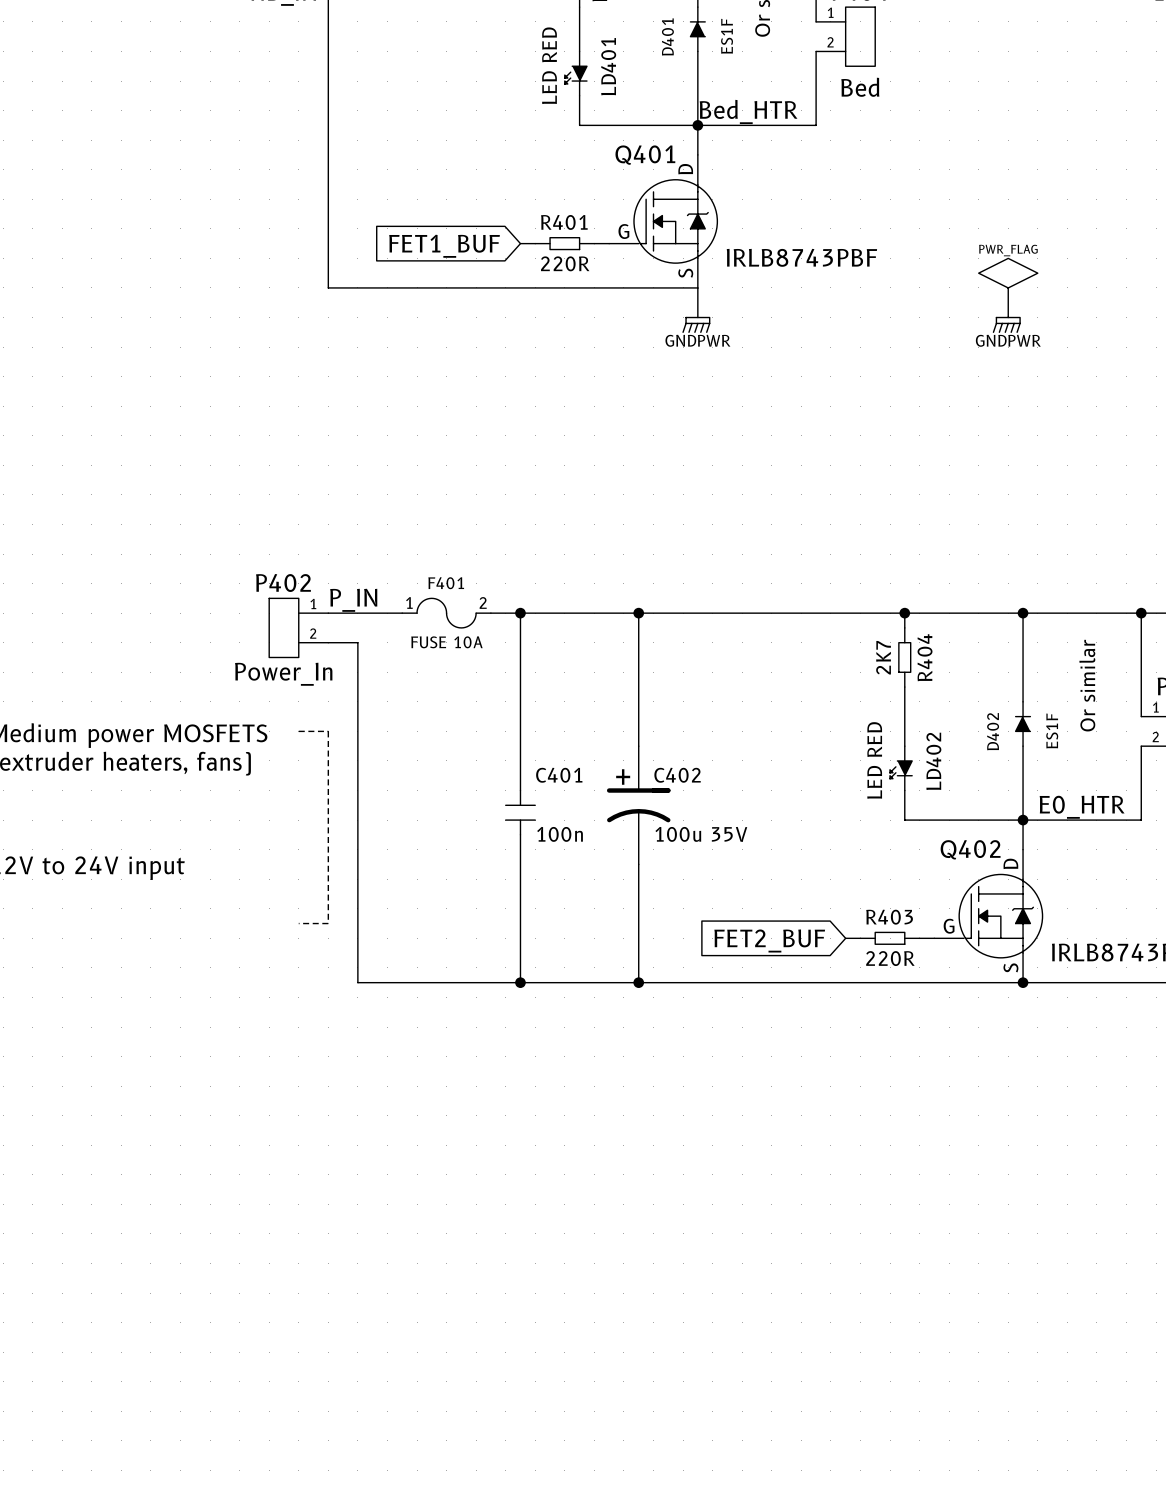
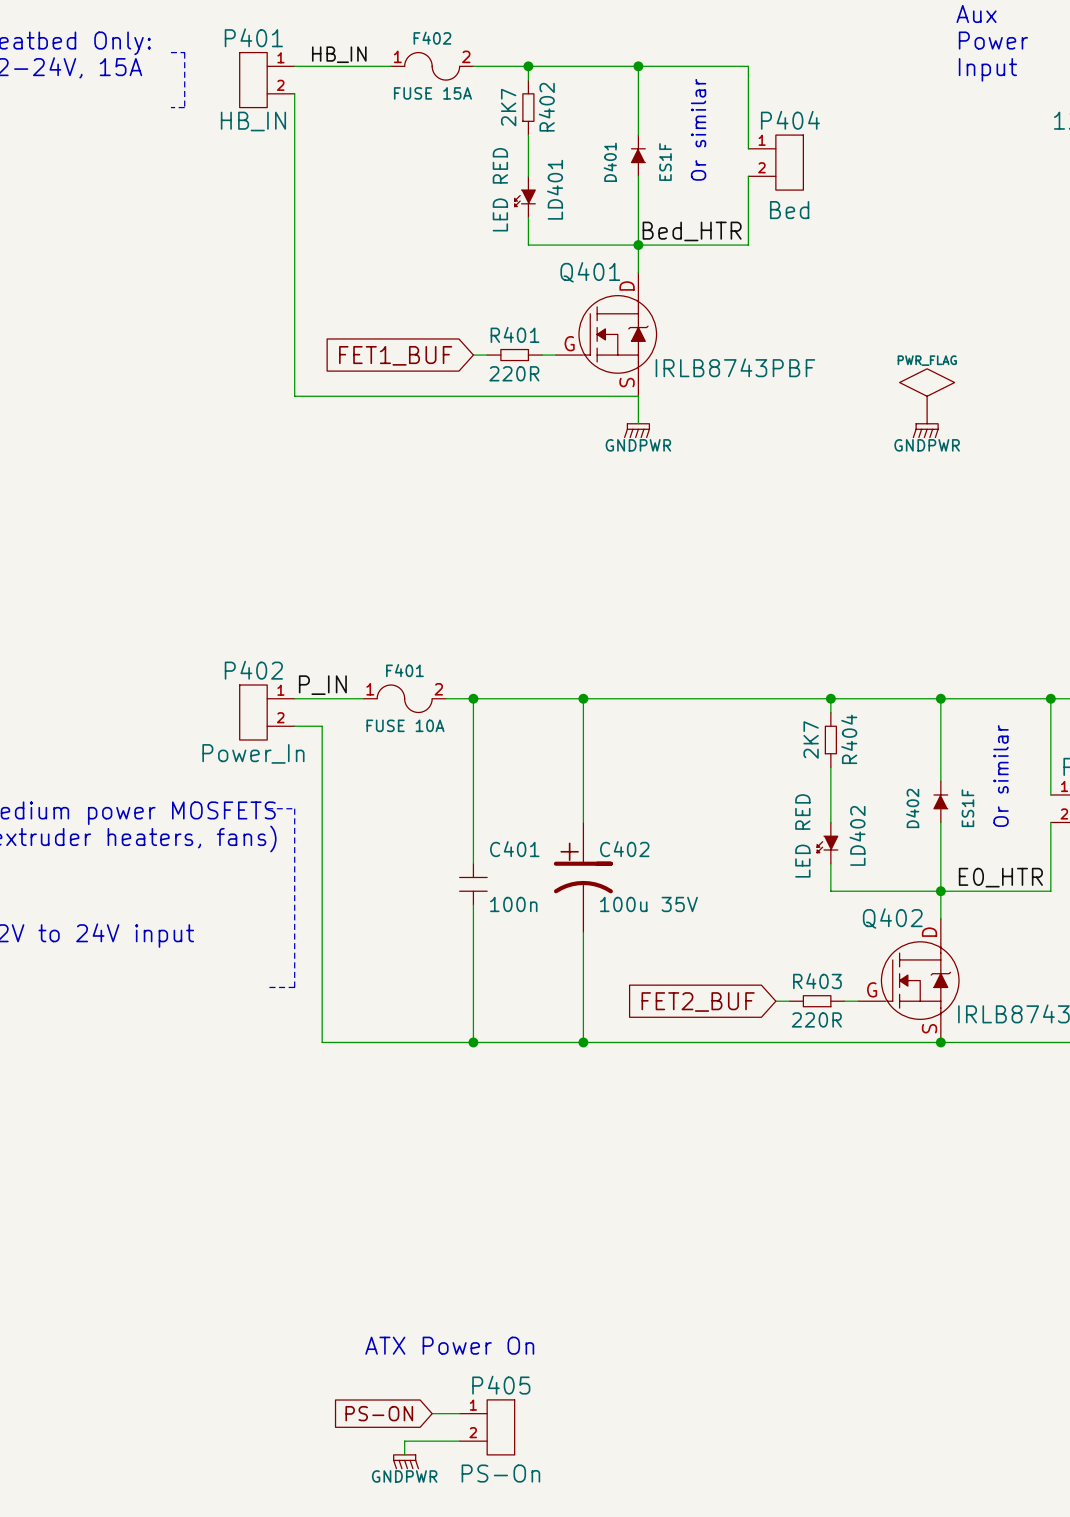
text: none -> ATX Power On (449, 1345)
global label: none -> PS-ON (379, 1413)
wire: none -> (432, 1413) (459, 1413)
P405: none -> PS-On (487, 1427)
wire: none -> (459, 1441) (404, 1441) (404, 1454)
power symbol: none -> GNDPWR (406, 1461)

